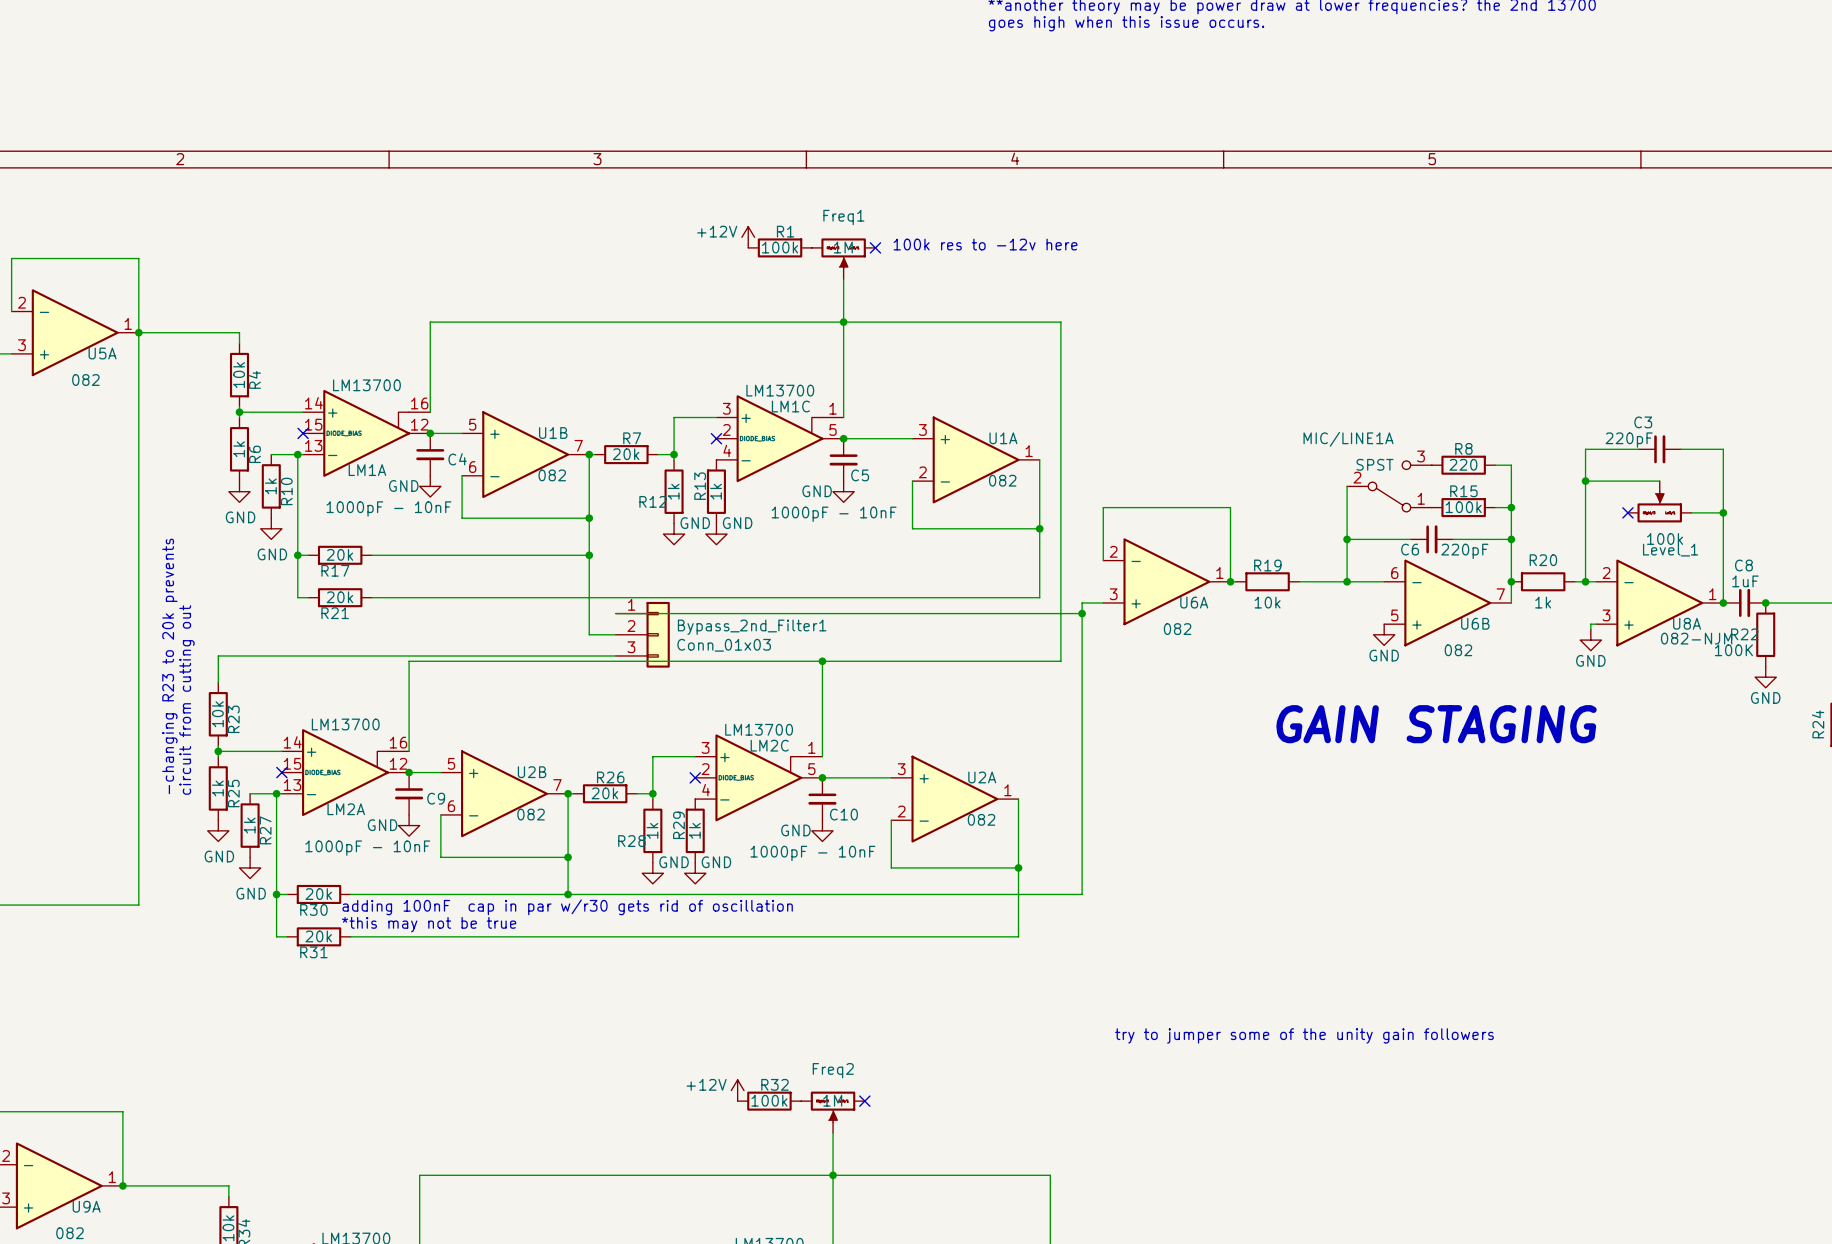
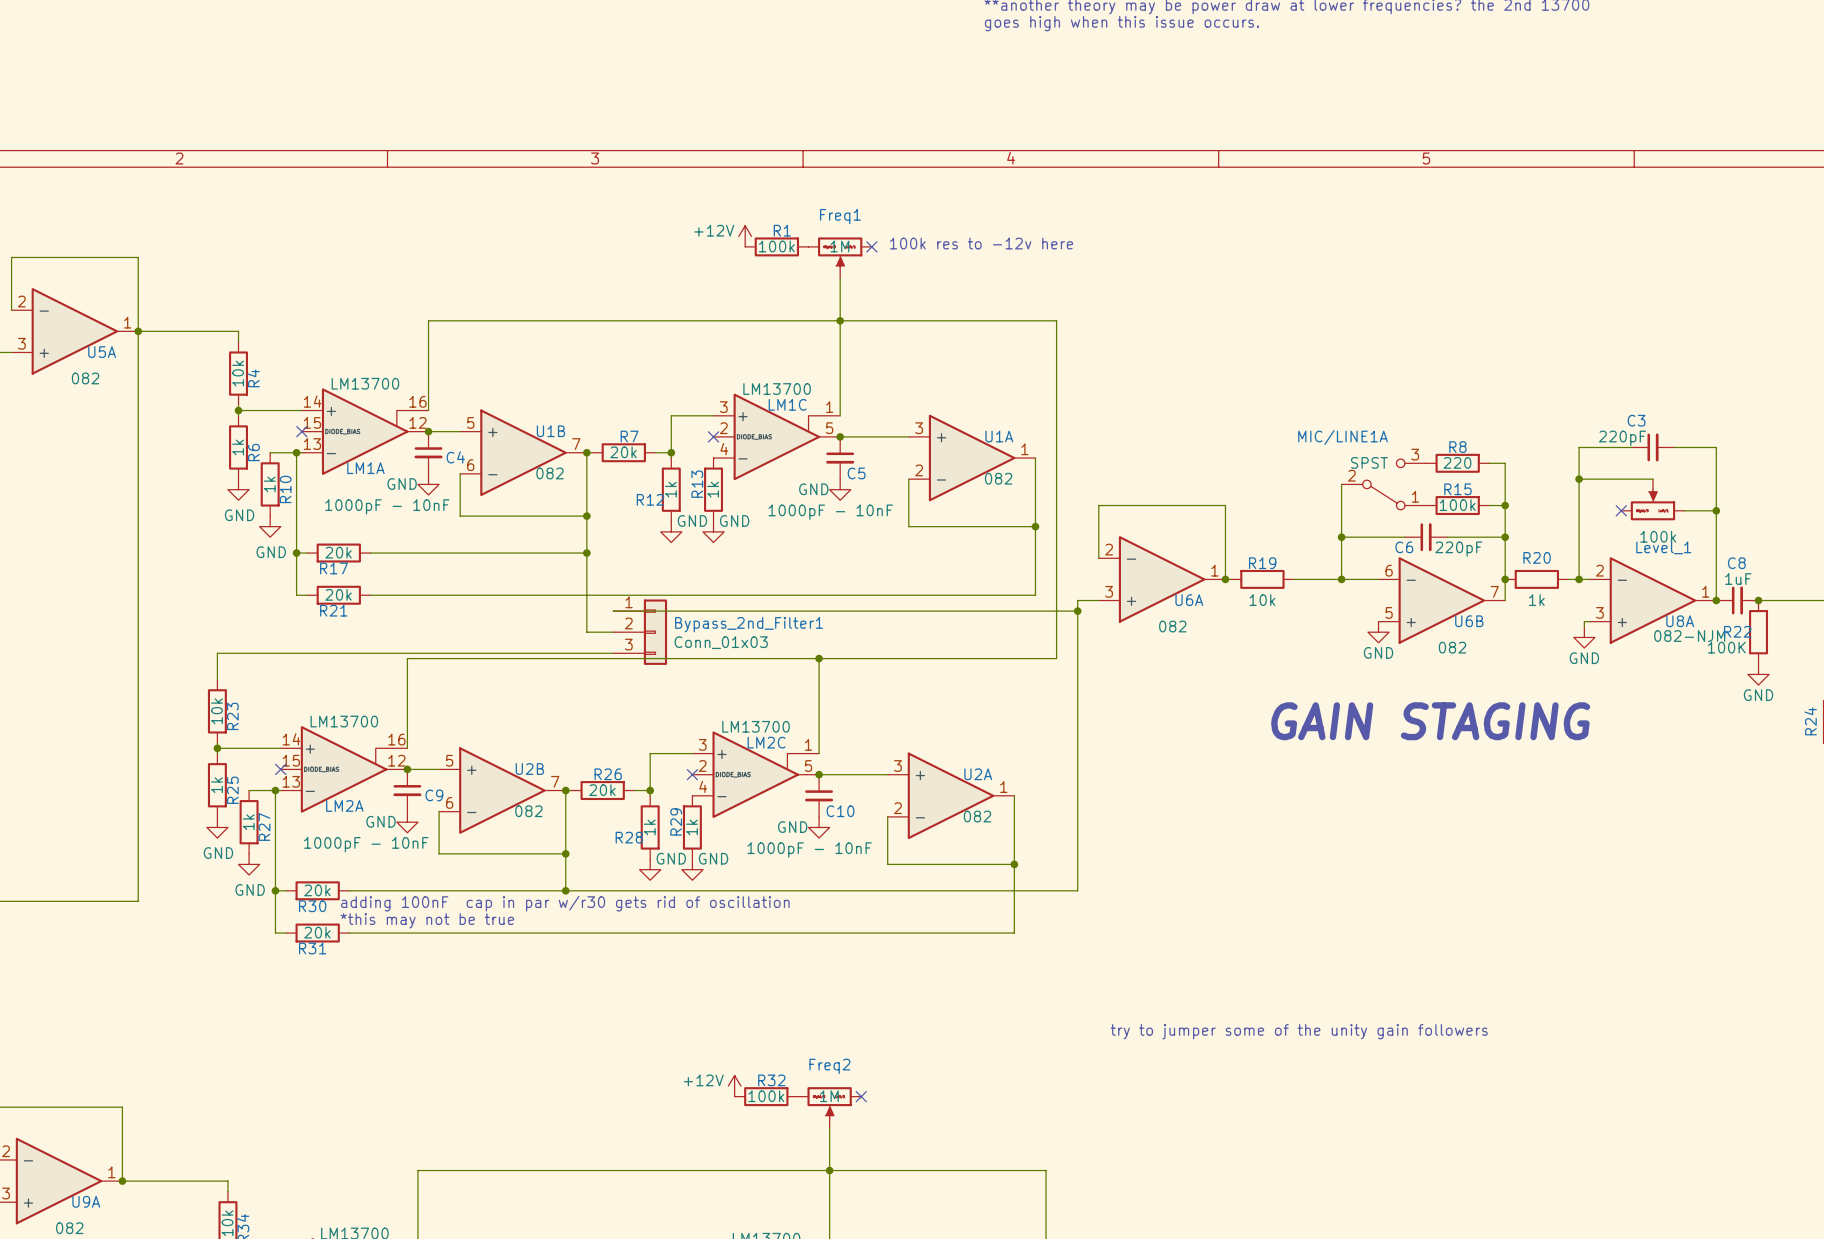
text: -changing R23 to 20k prevents (169, 666) -> none
text: circuit from cutting out (186, 699) -> none

